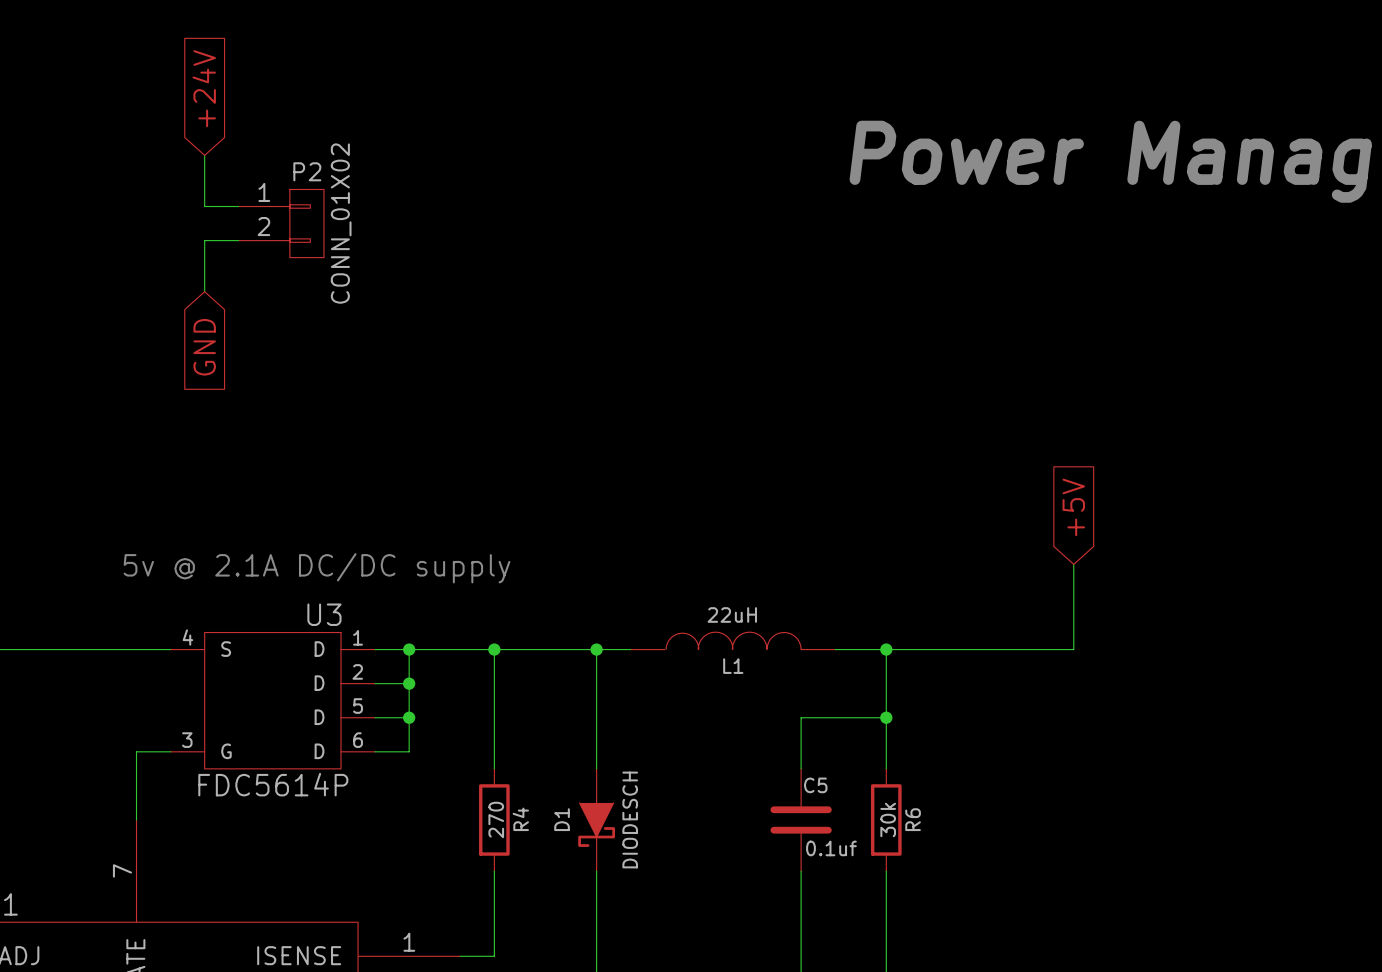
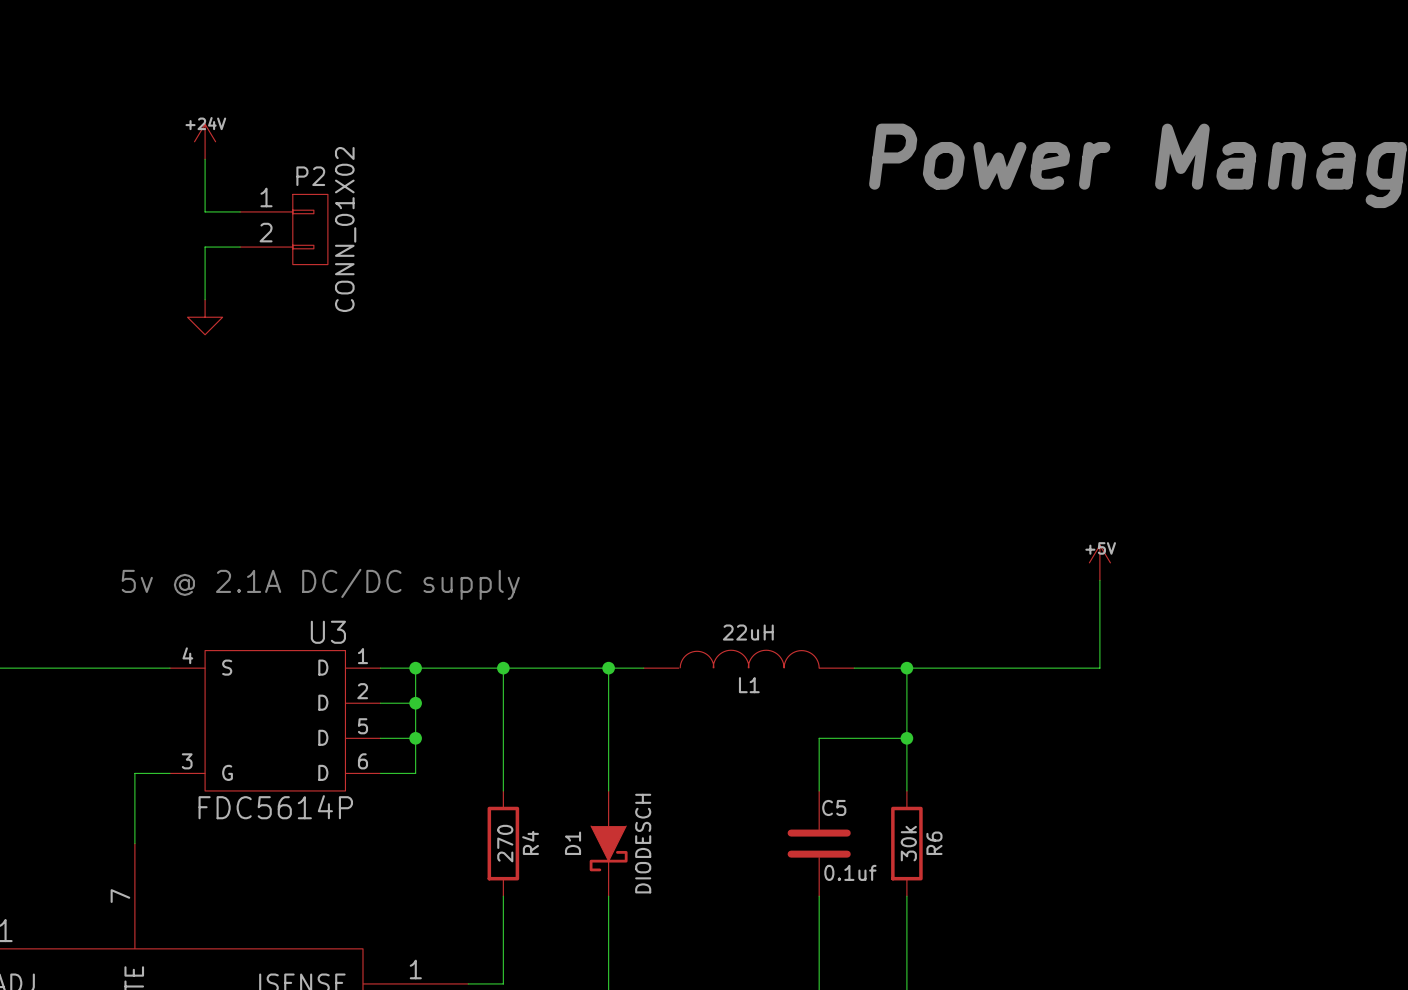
global label: +24V (204, 88) -> none
power symbol: none -> +24V (205, 141)
power symbol: none -> (205, 317)
global label: GND (204, 347) -> none
global label: +5V (1073, 507) -> none
power symbol: none -> +5V (1099, 562)

